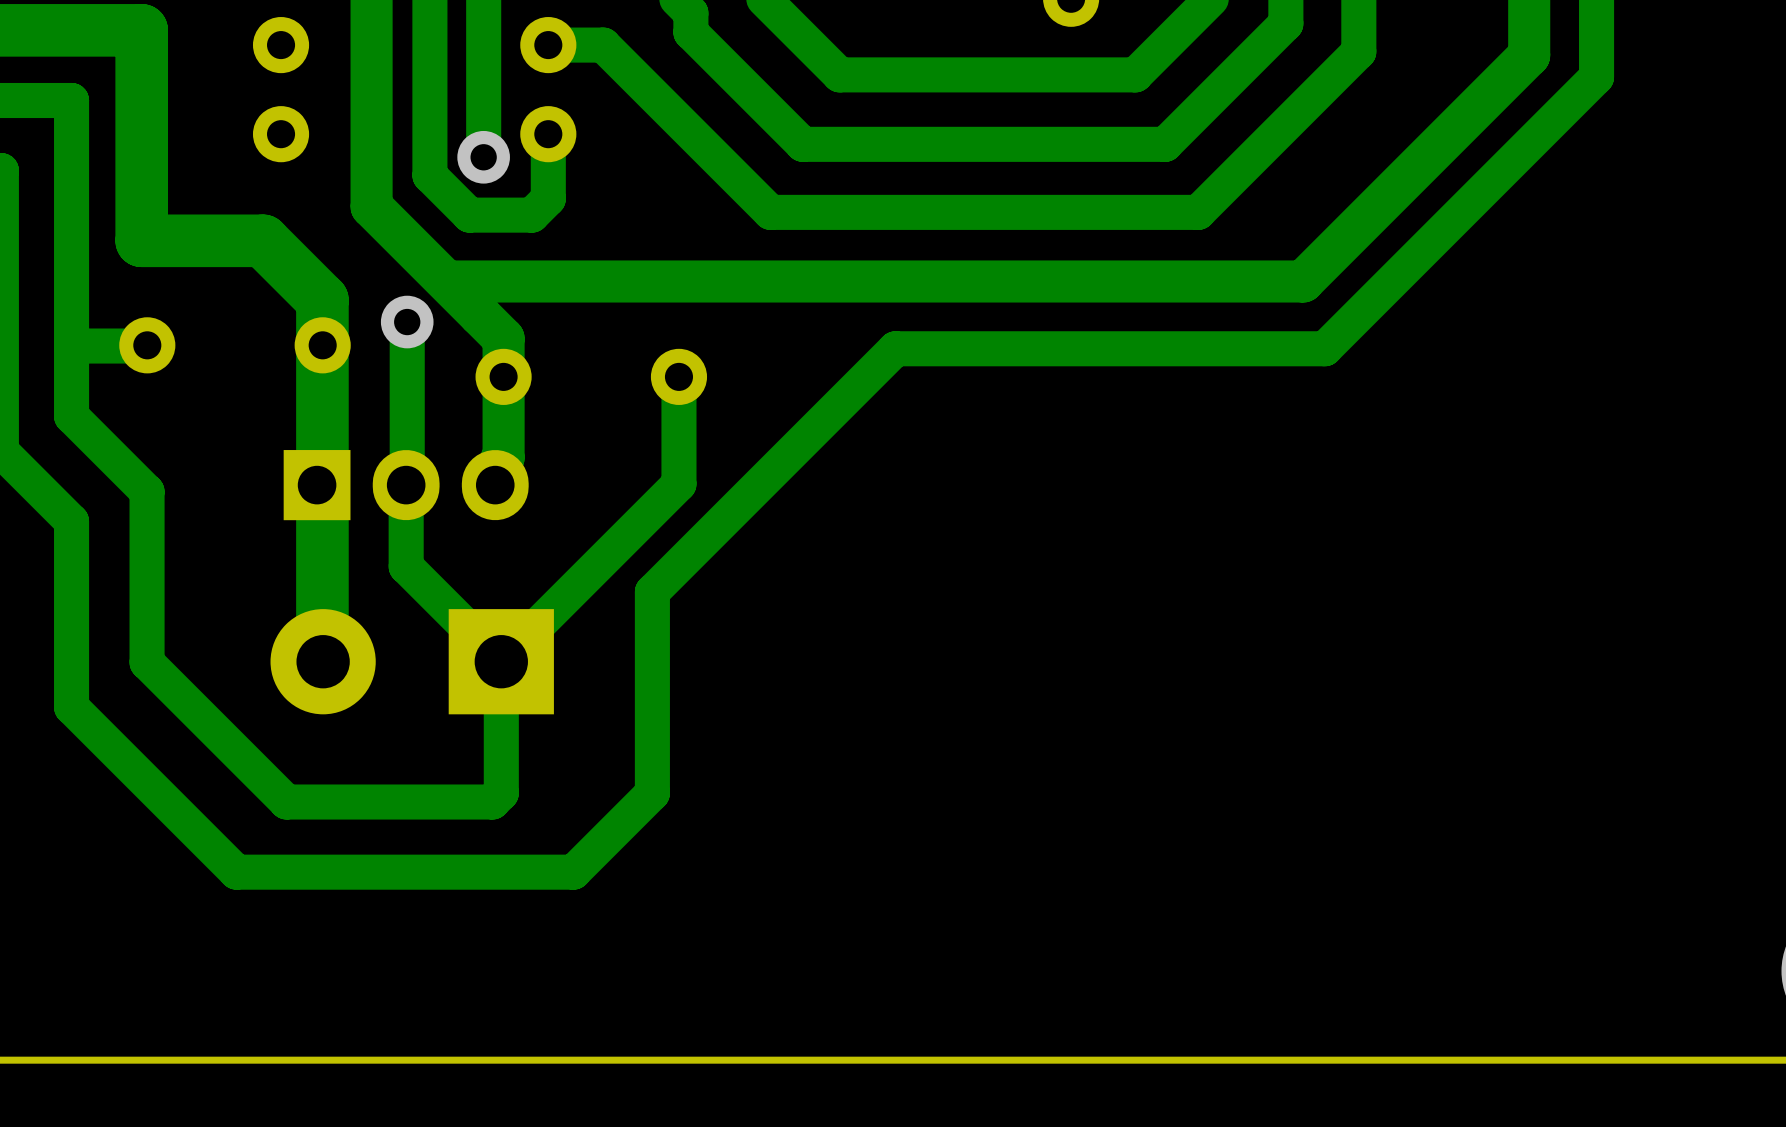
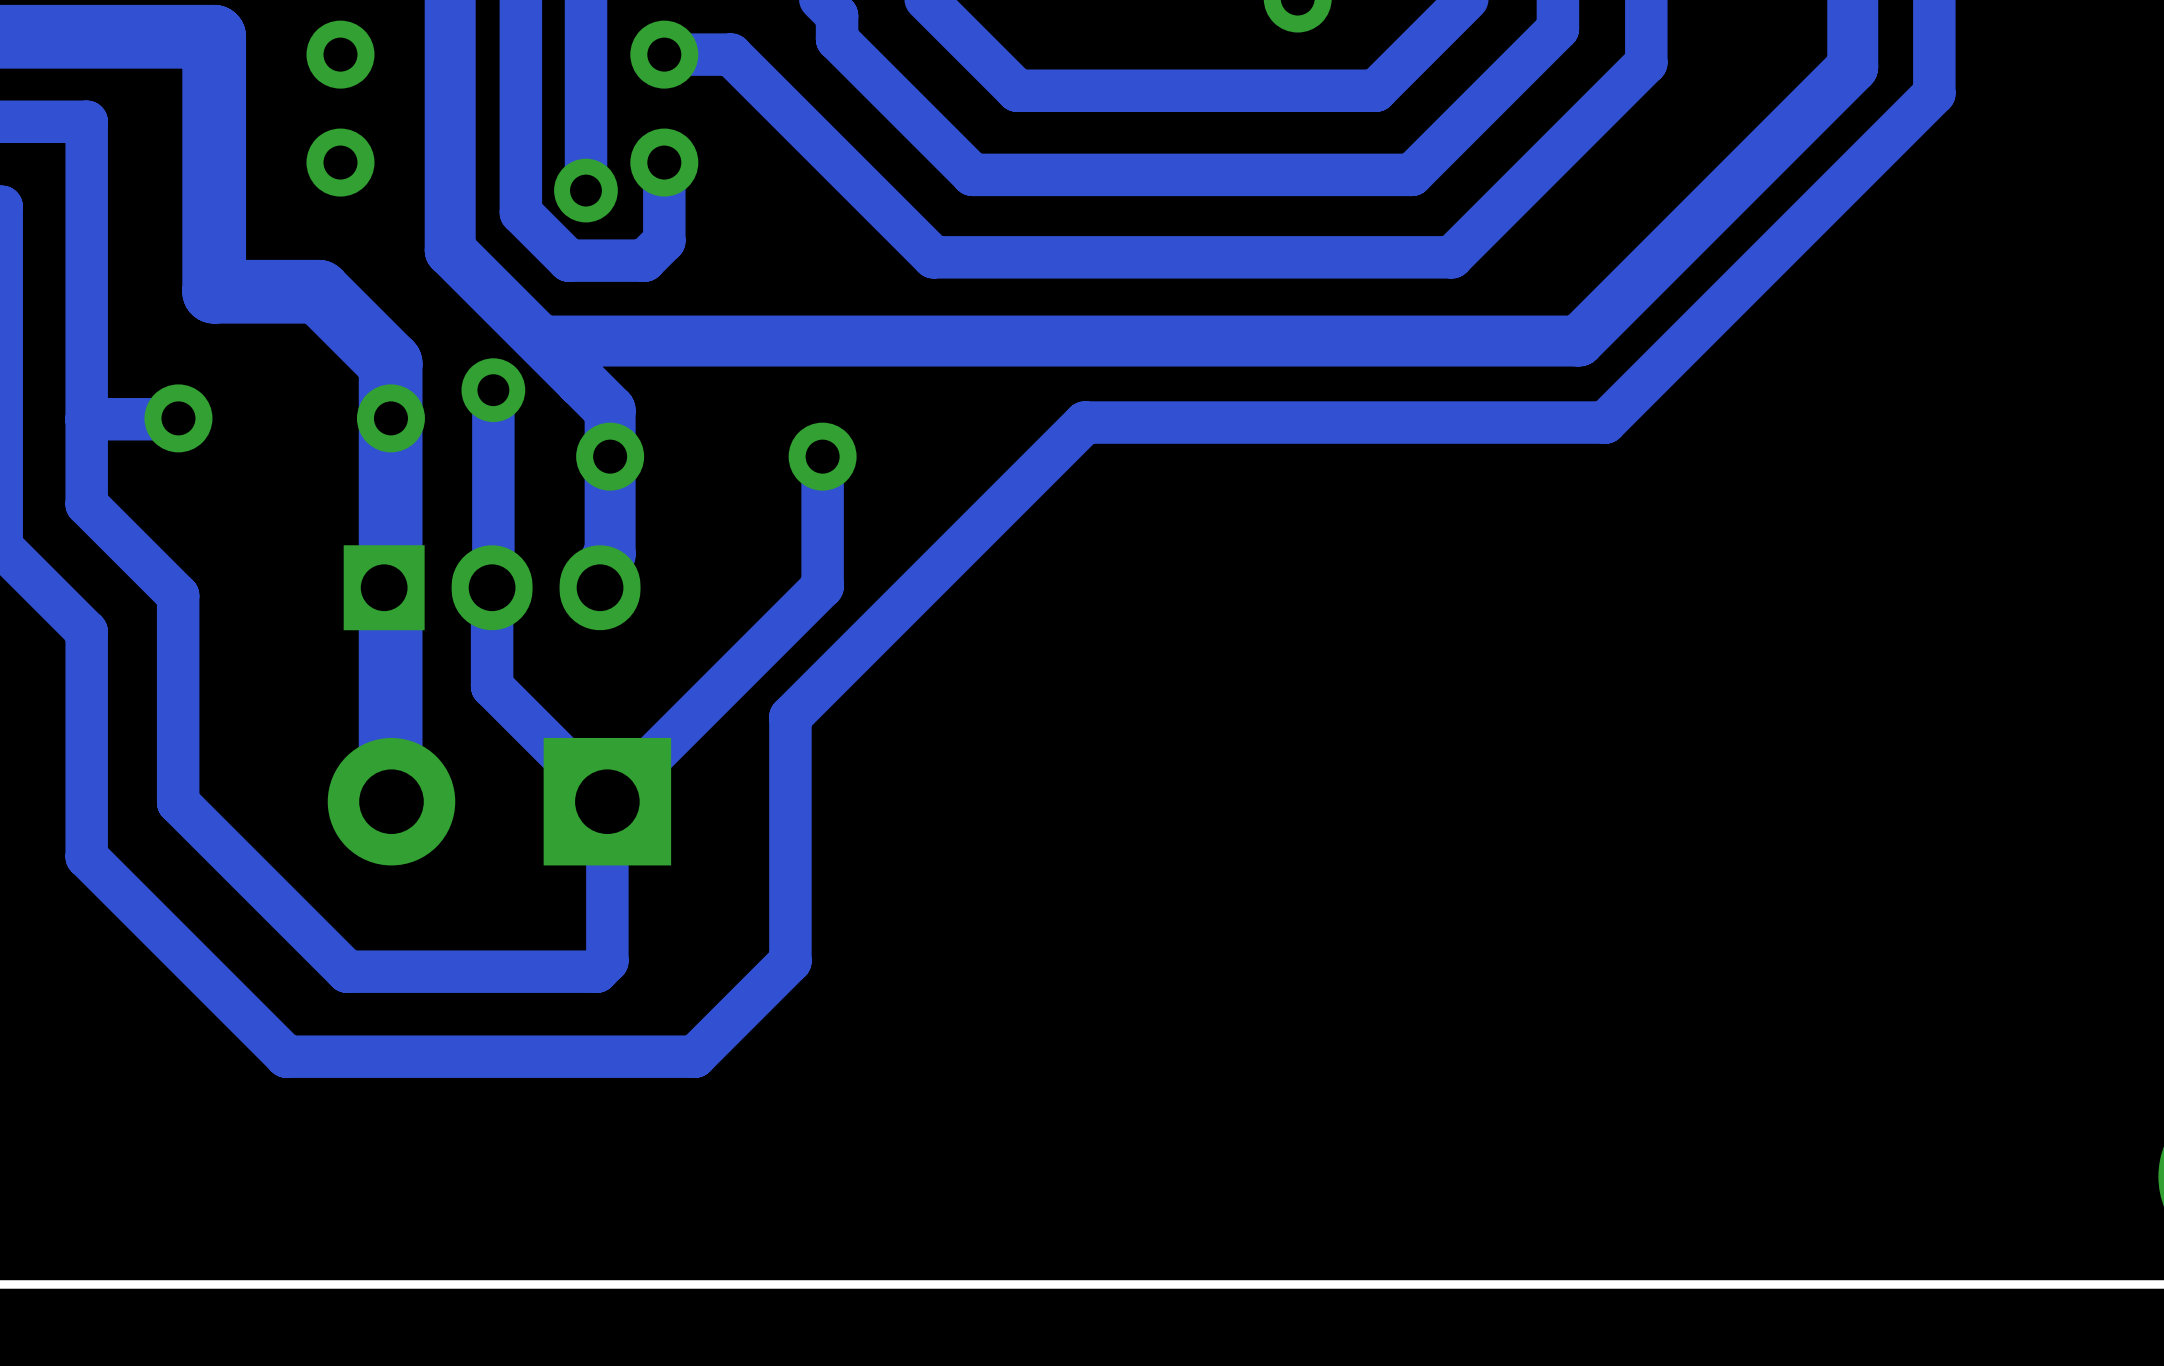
track: (141, 30) (141, 240) (176, 240) -> (171, 36) (214, 36) (214, 291)

